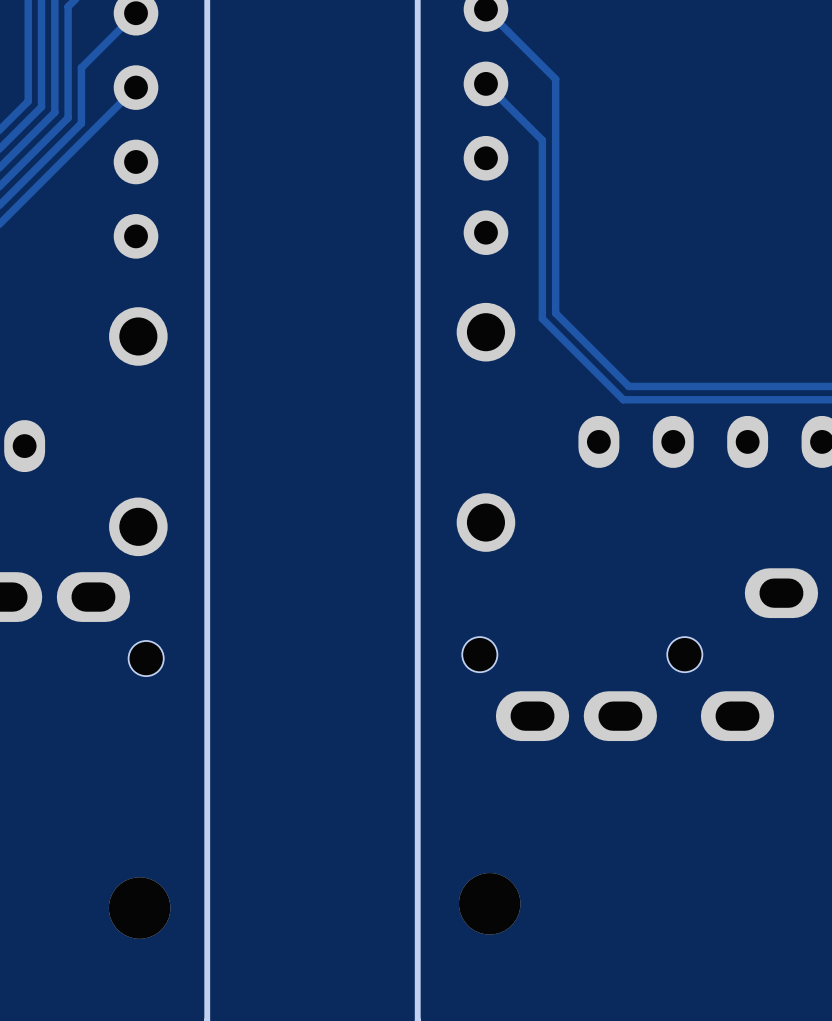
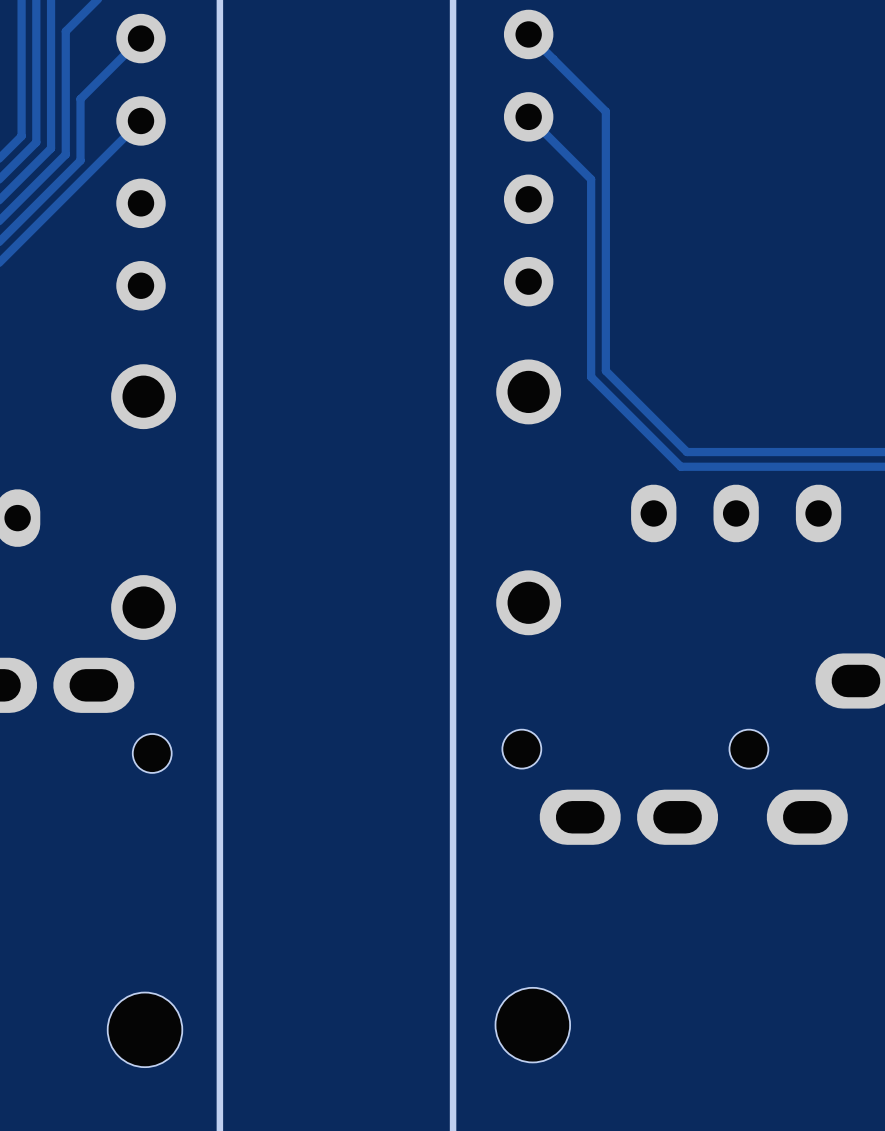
part footprint: [458, 873, 521, 935] -> [495, 987, 571, 1063]
part footprint: [108, 877, 171, 939] -> [107, 992, 183, 1068]

